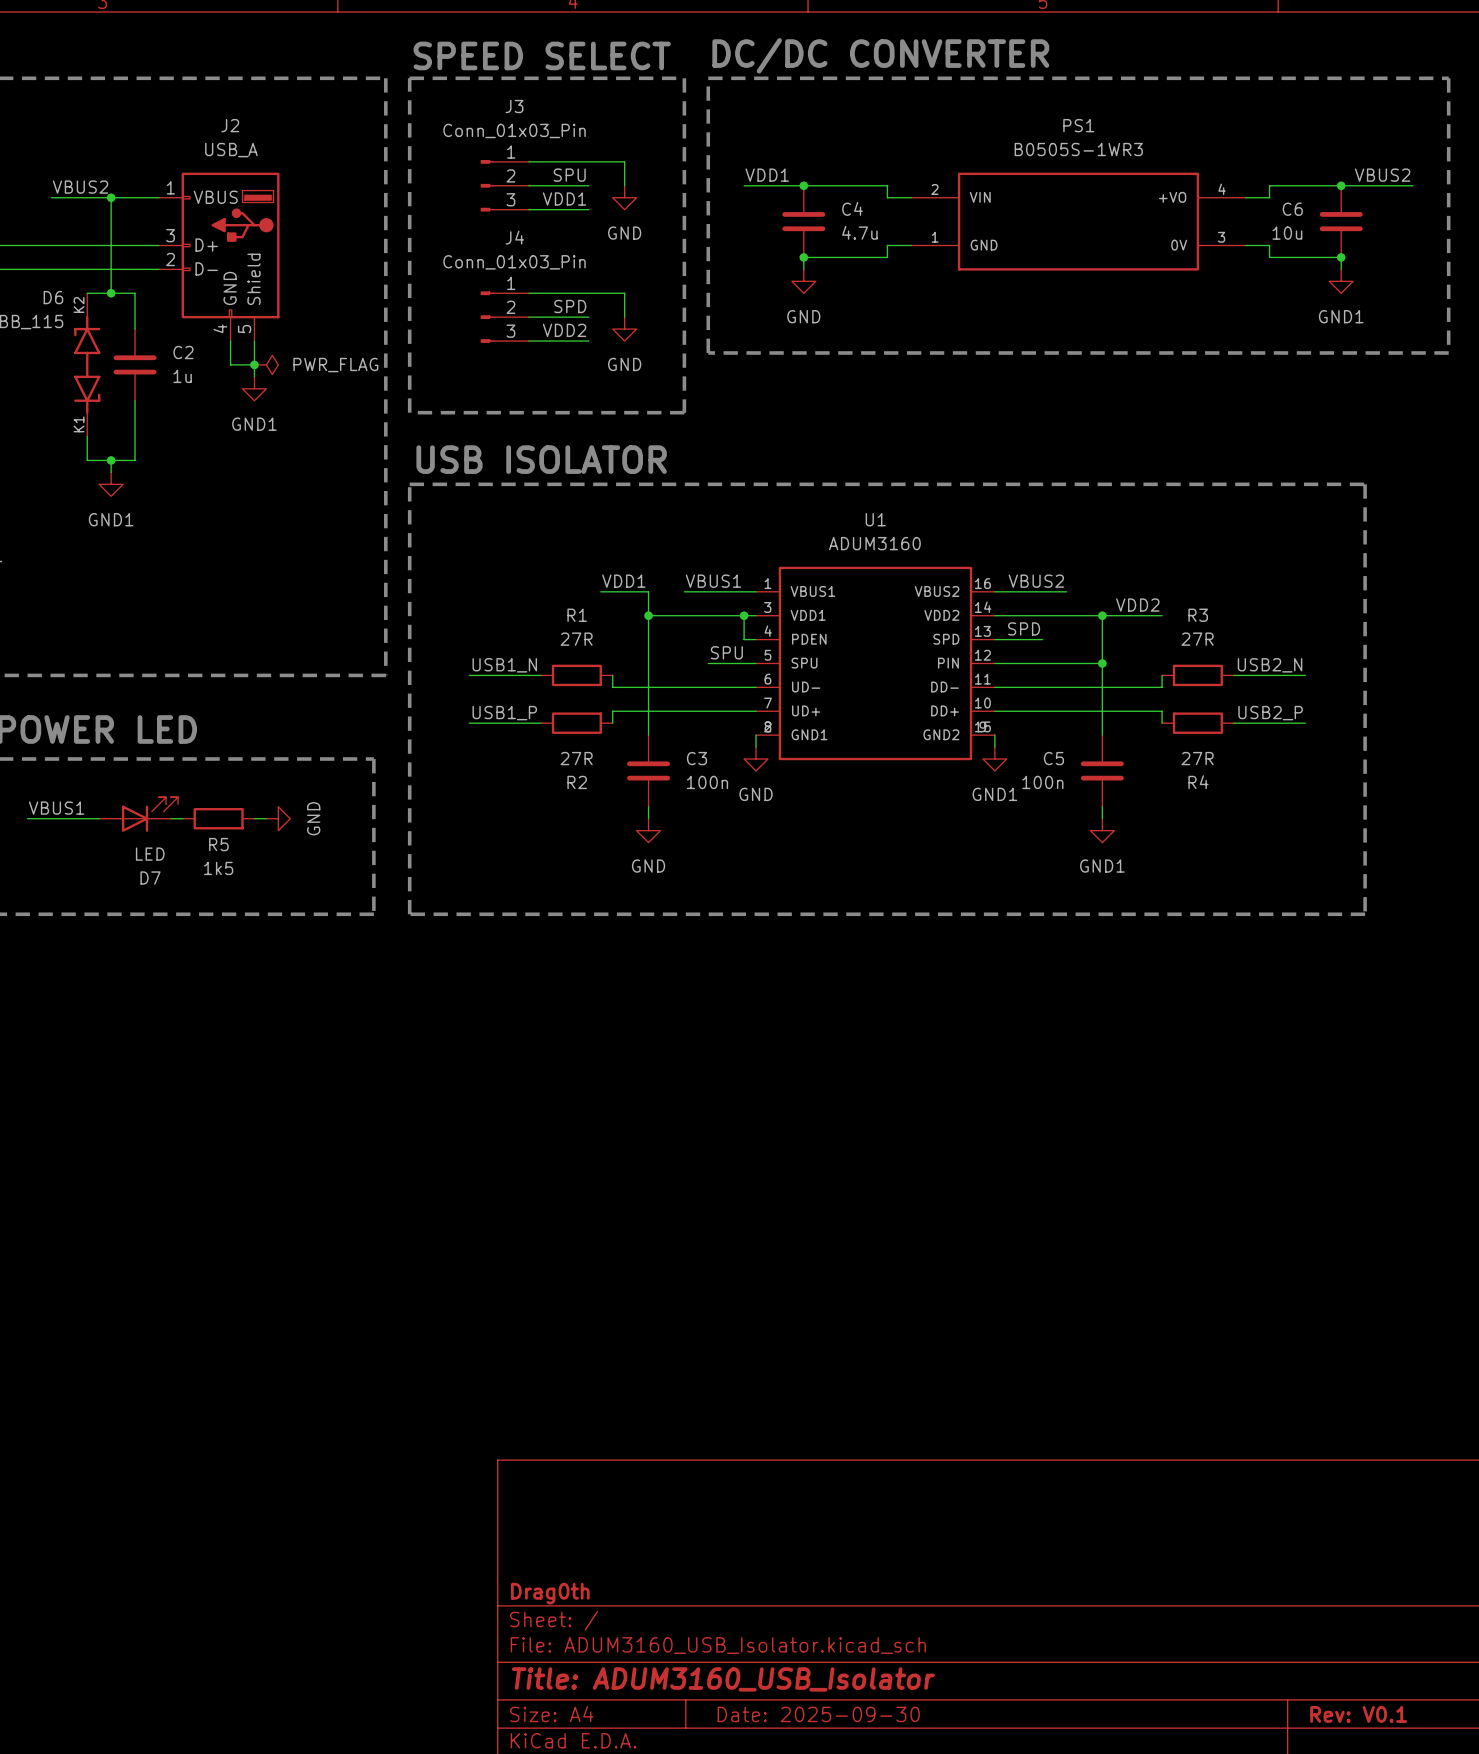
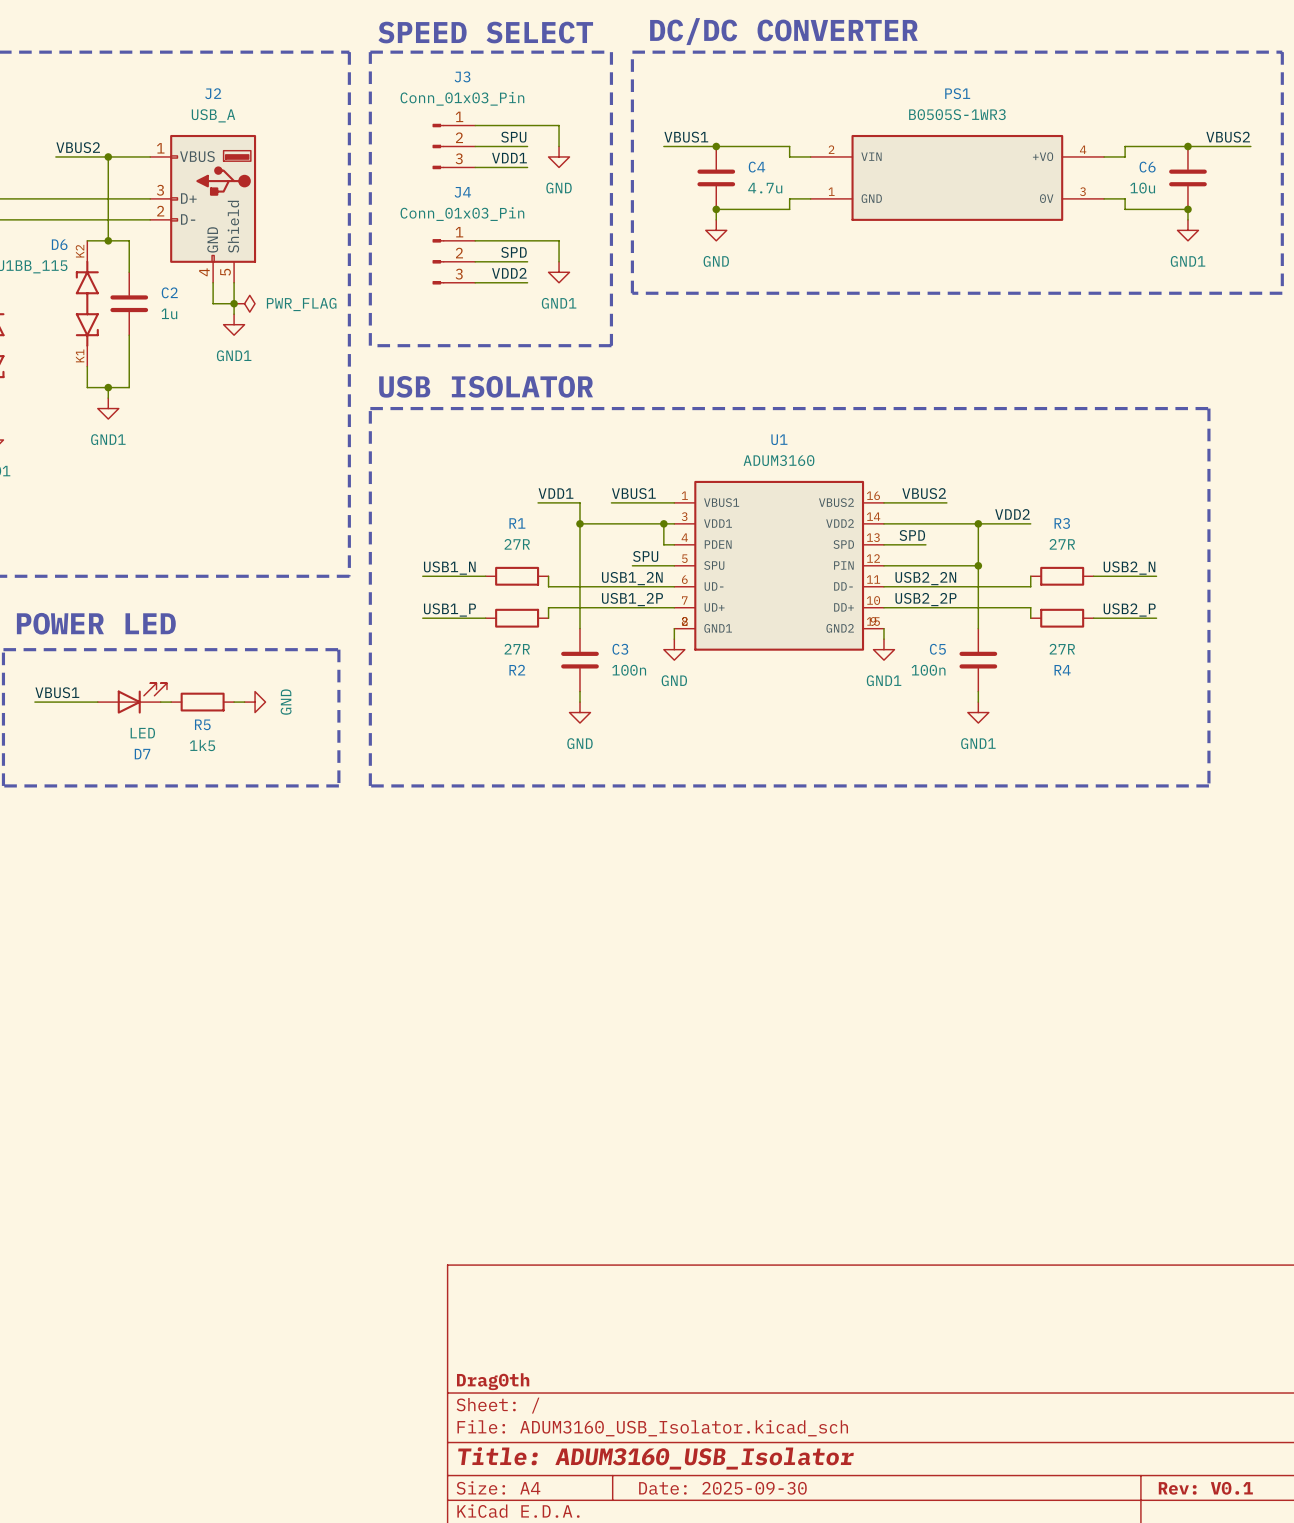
label: VDD1 (767, 175) -> VBUS1 (686, 137)
power symbol: GND (624, 329) -> GND1 (559, 272)
label: none -> USB1_2N (632, 578)
label: none -> USB2_2N (925, 578)
label: none -> USB1_2P (632, 599)
label: none -> USB2_2P (926, 599)

